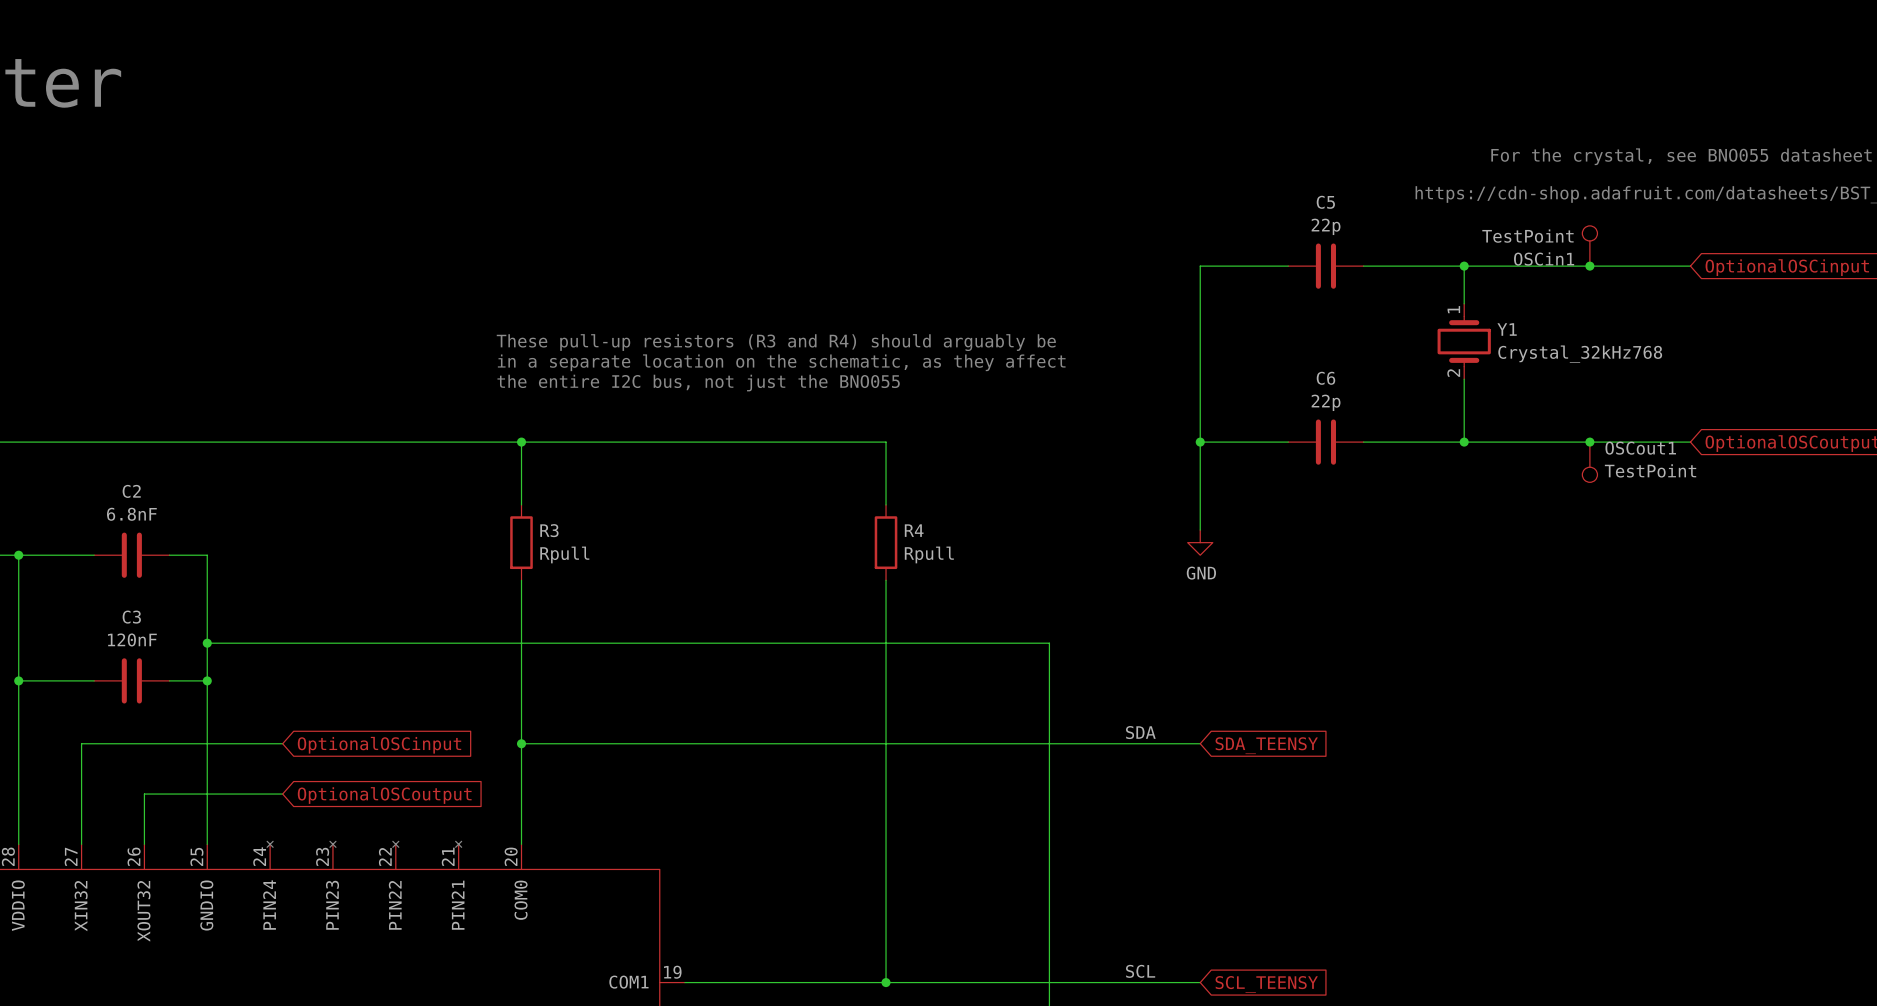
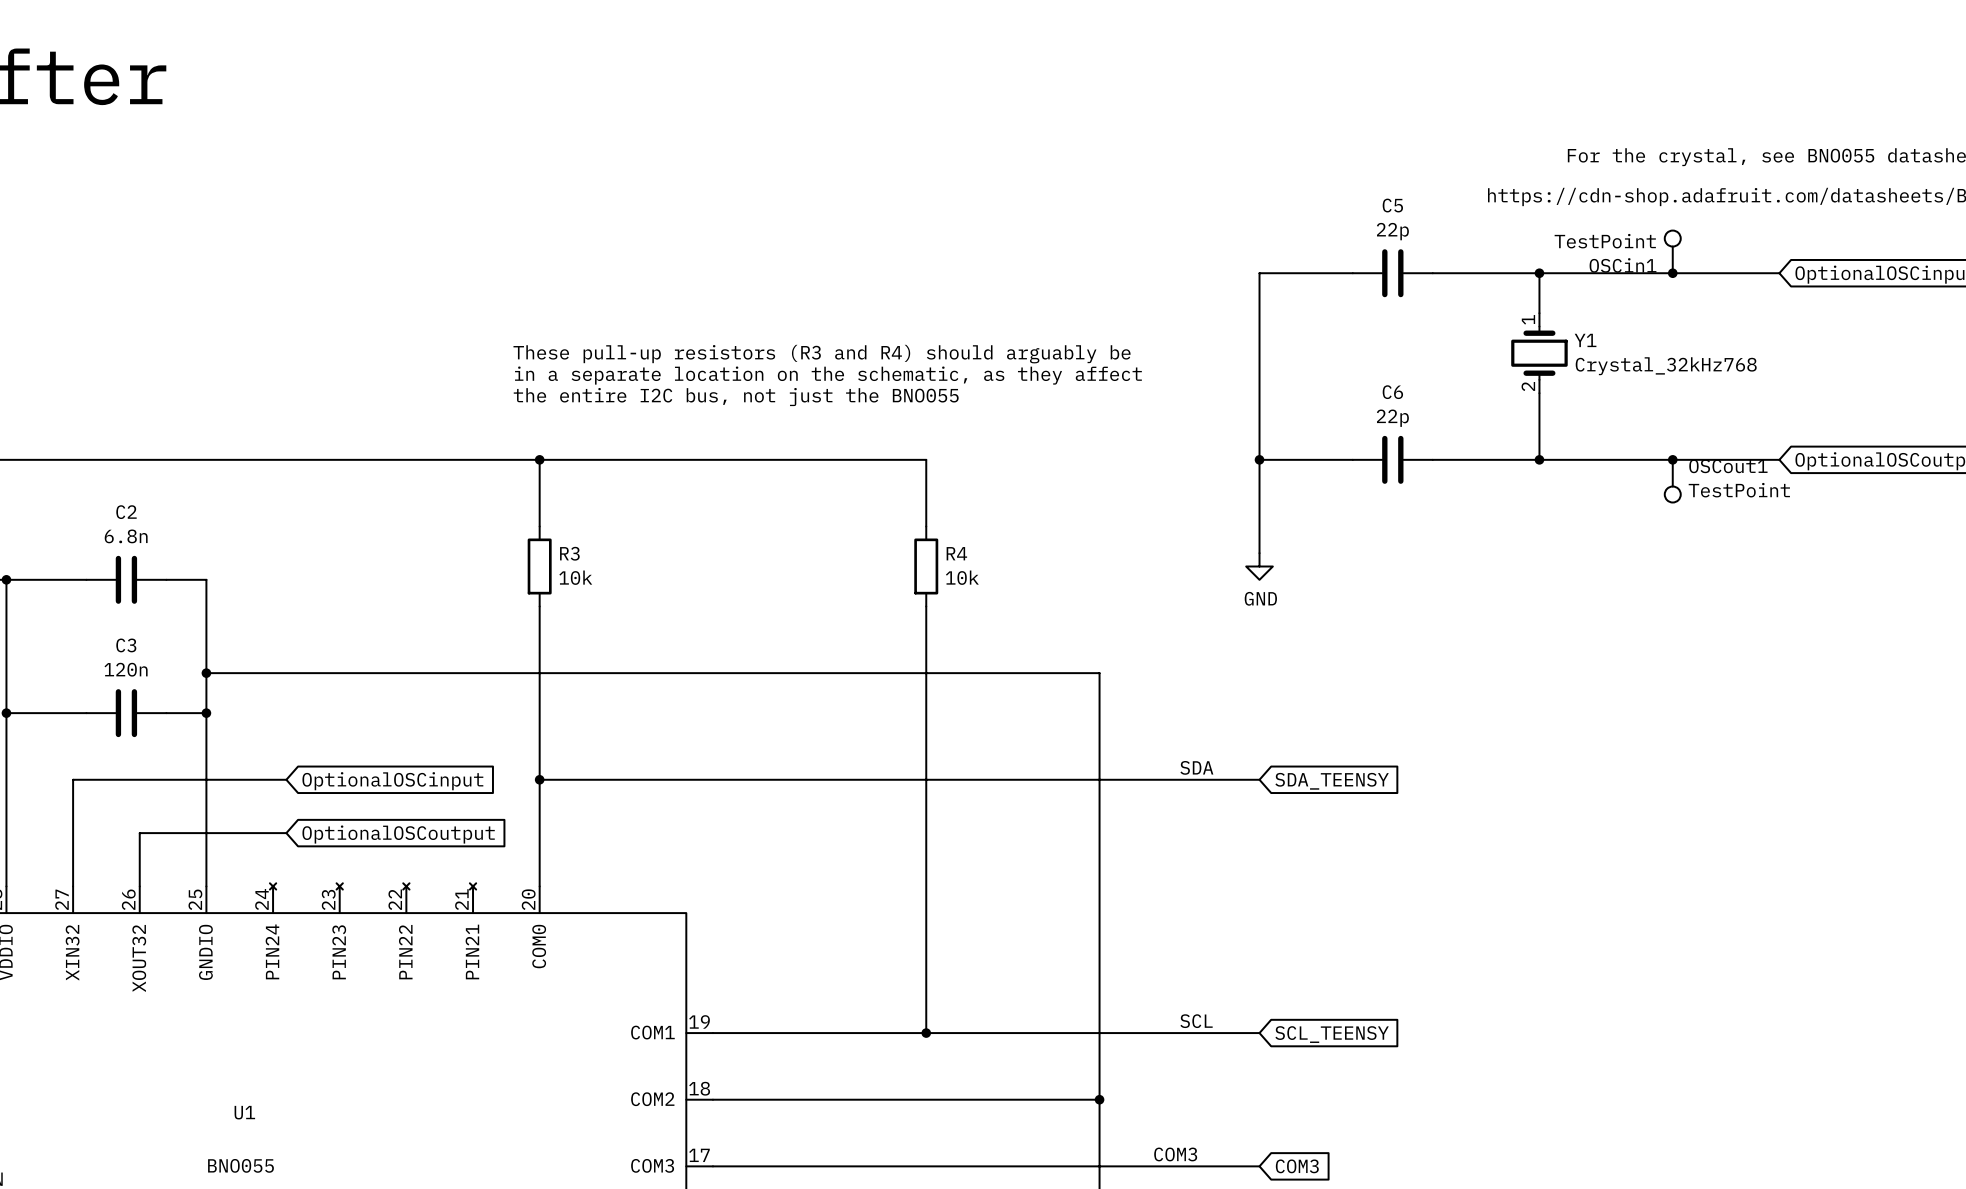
C2 value: 6.8nF (131, 514) -> 6.8n (126, 536)
R3 value: Rpull (564, 554) -> 10k (575, 577)
R4 value: Rpull (929, 554) -> 10k (962, 577)
C3 value: 120nF (132, 639) -> 120n (126, 669)

